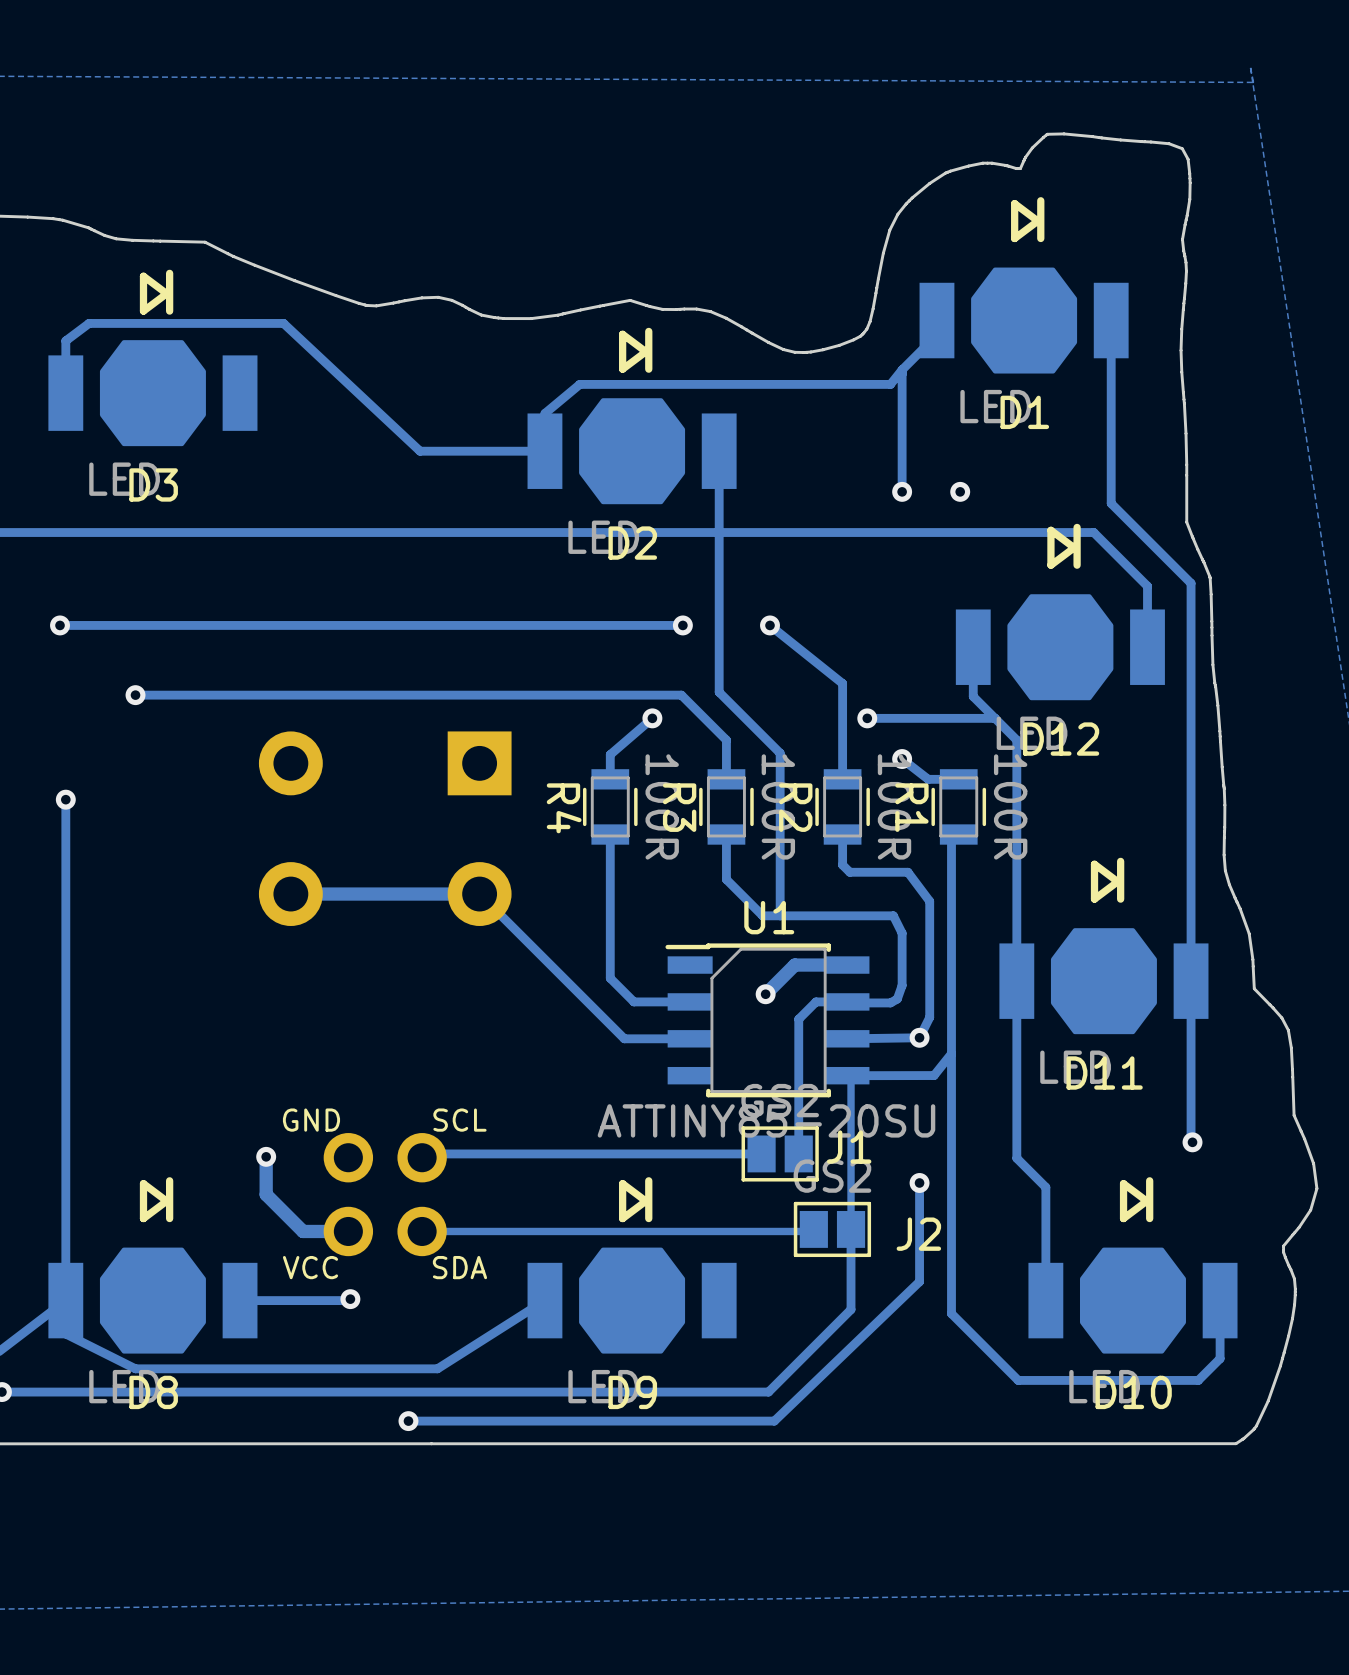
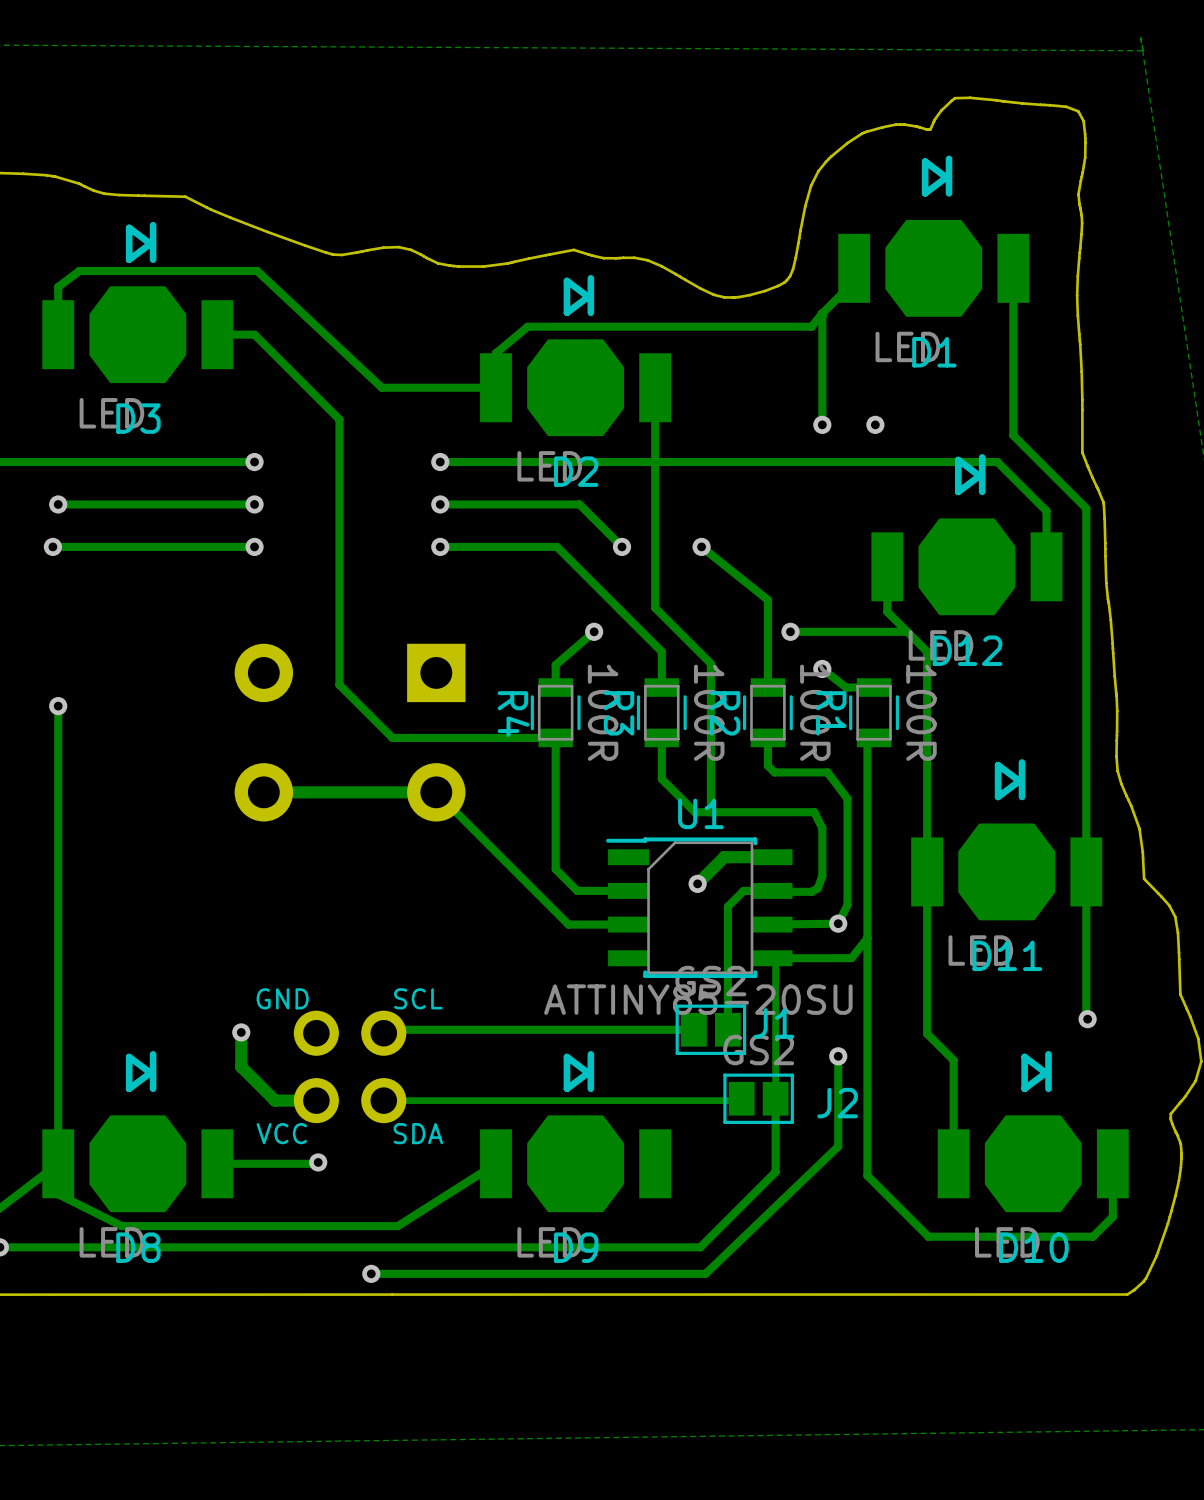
track: none -> (217, 334) (254, 334) (339, 419) (339, 684) (392, 737) (555, 737)
via: none -> (254, 462)
track: (483, 532) (280, 532) -> none
via: none -> (440, 462)
via: none -> (58, 504)
track: none -> (254, 504) (58, 504)
via: none -> (254, 504)
track: none -> (440, 504) (579, 504) (622, 546)
via: none -> (440, 504)
via: none -> (254, 546)
track: (483, 625) (280, 625) -> none
via: none -> (440, 546)
track: (682, 625) (611, 625) -> (620, 610) (557, 546)
via: (135, 695) -> none
track: (681, 695) (135, 695) -> none

